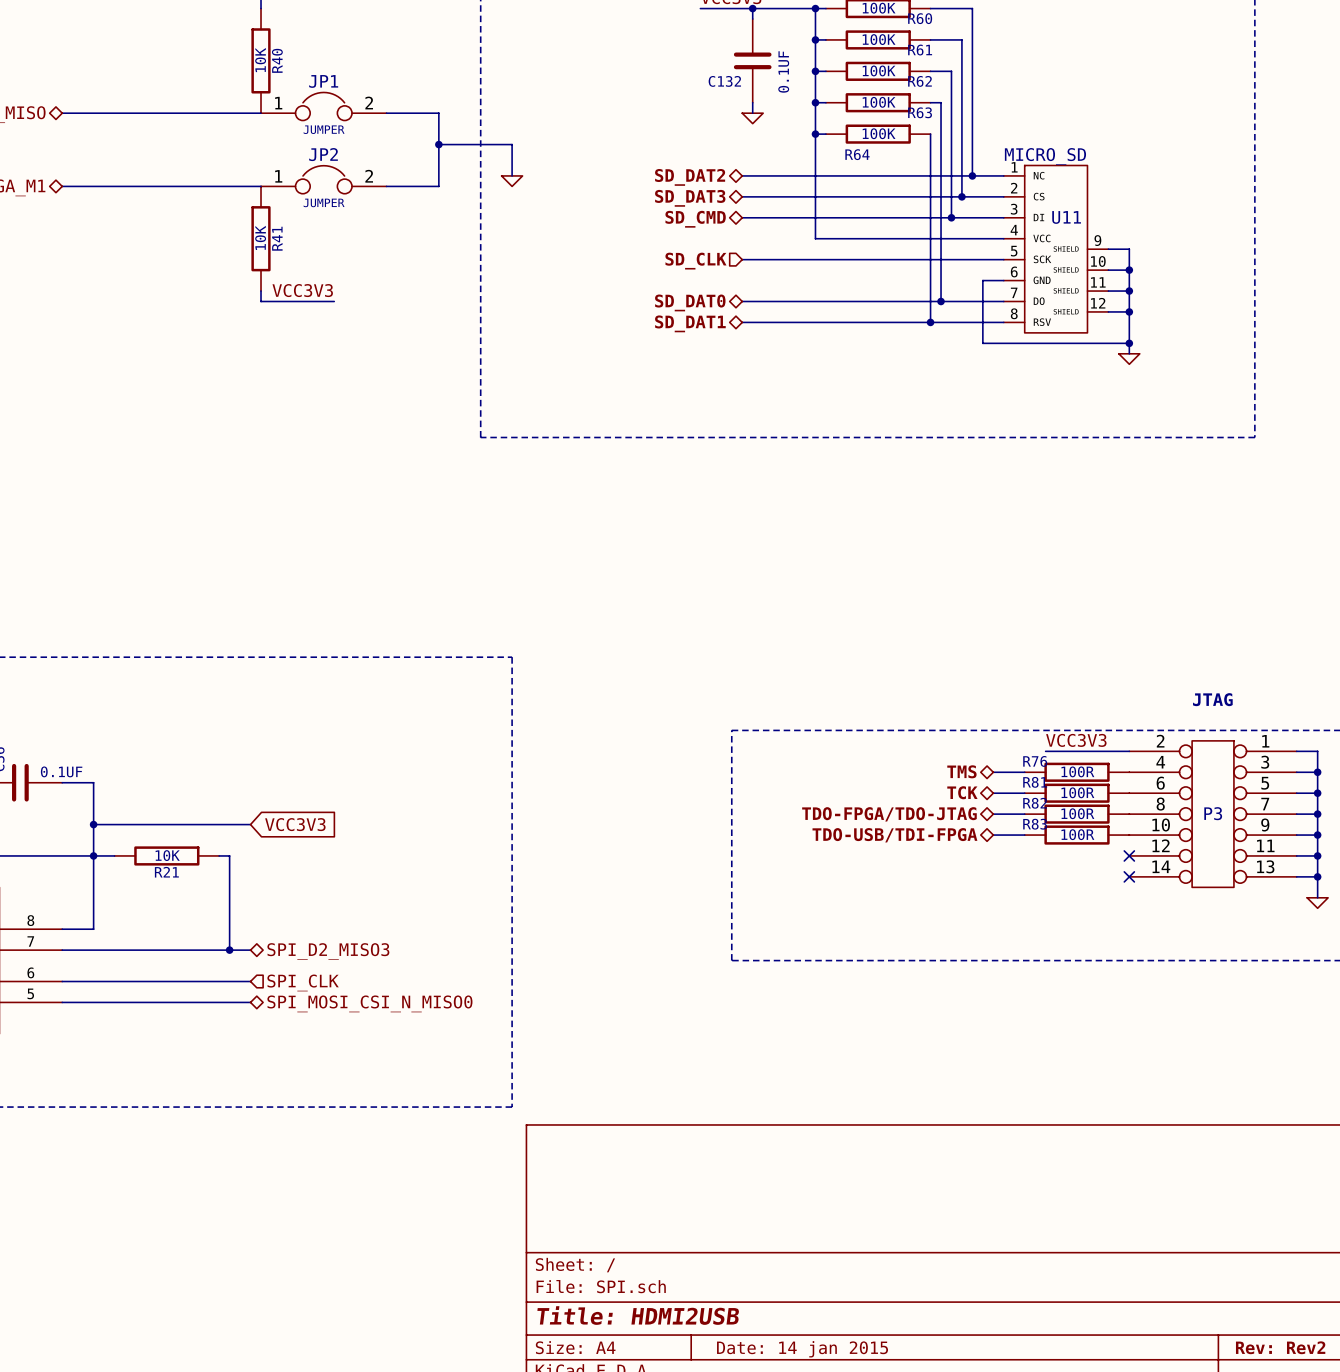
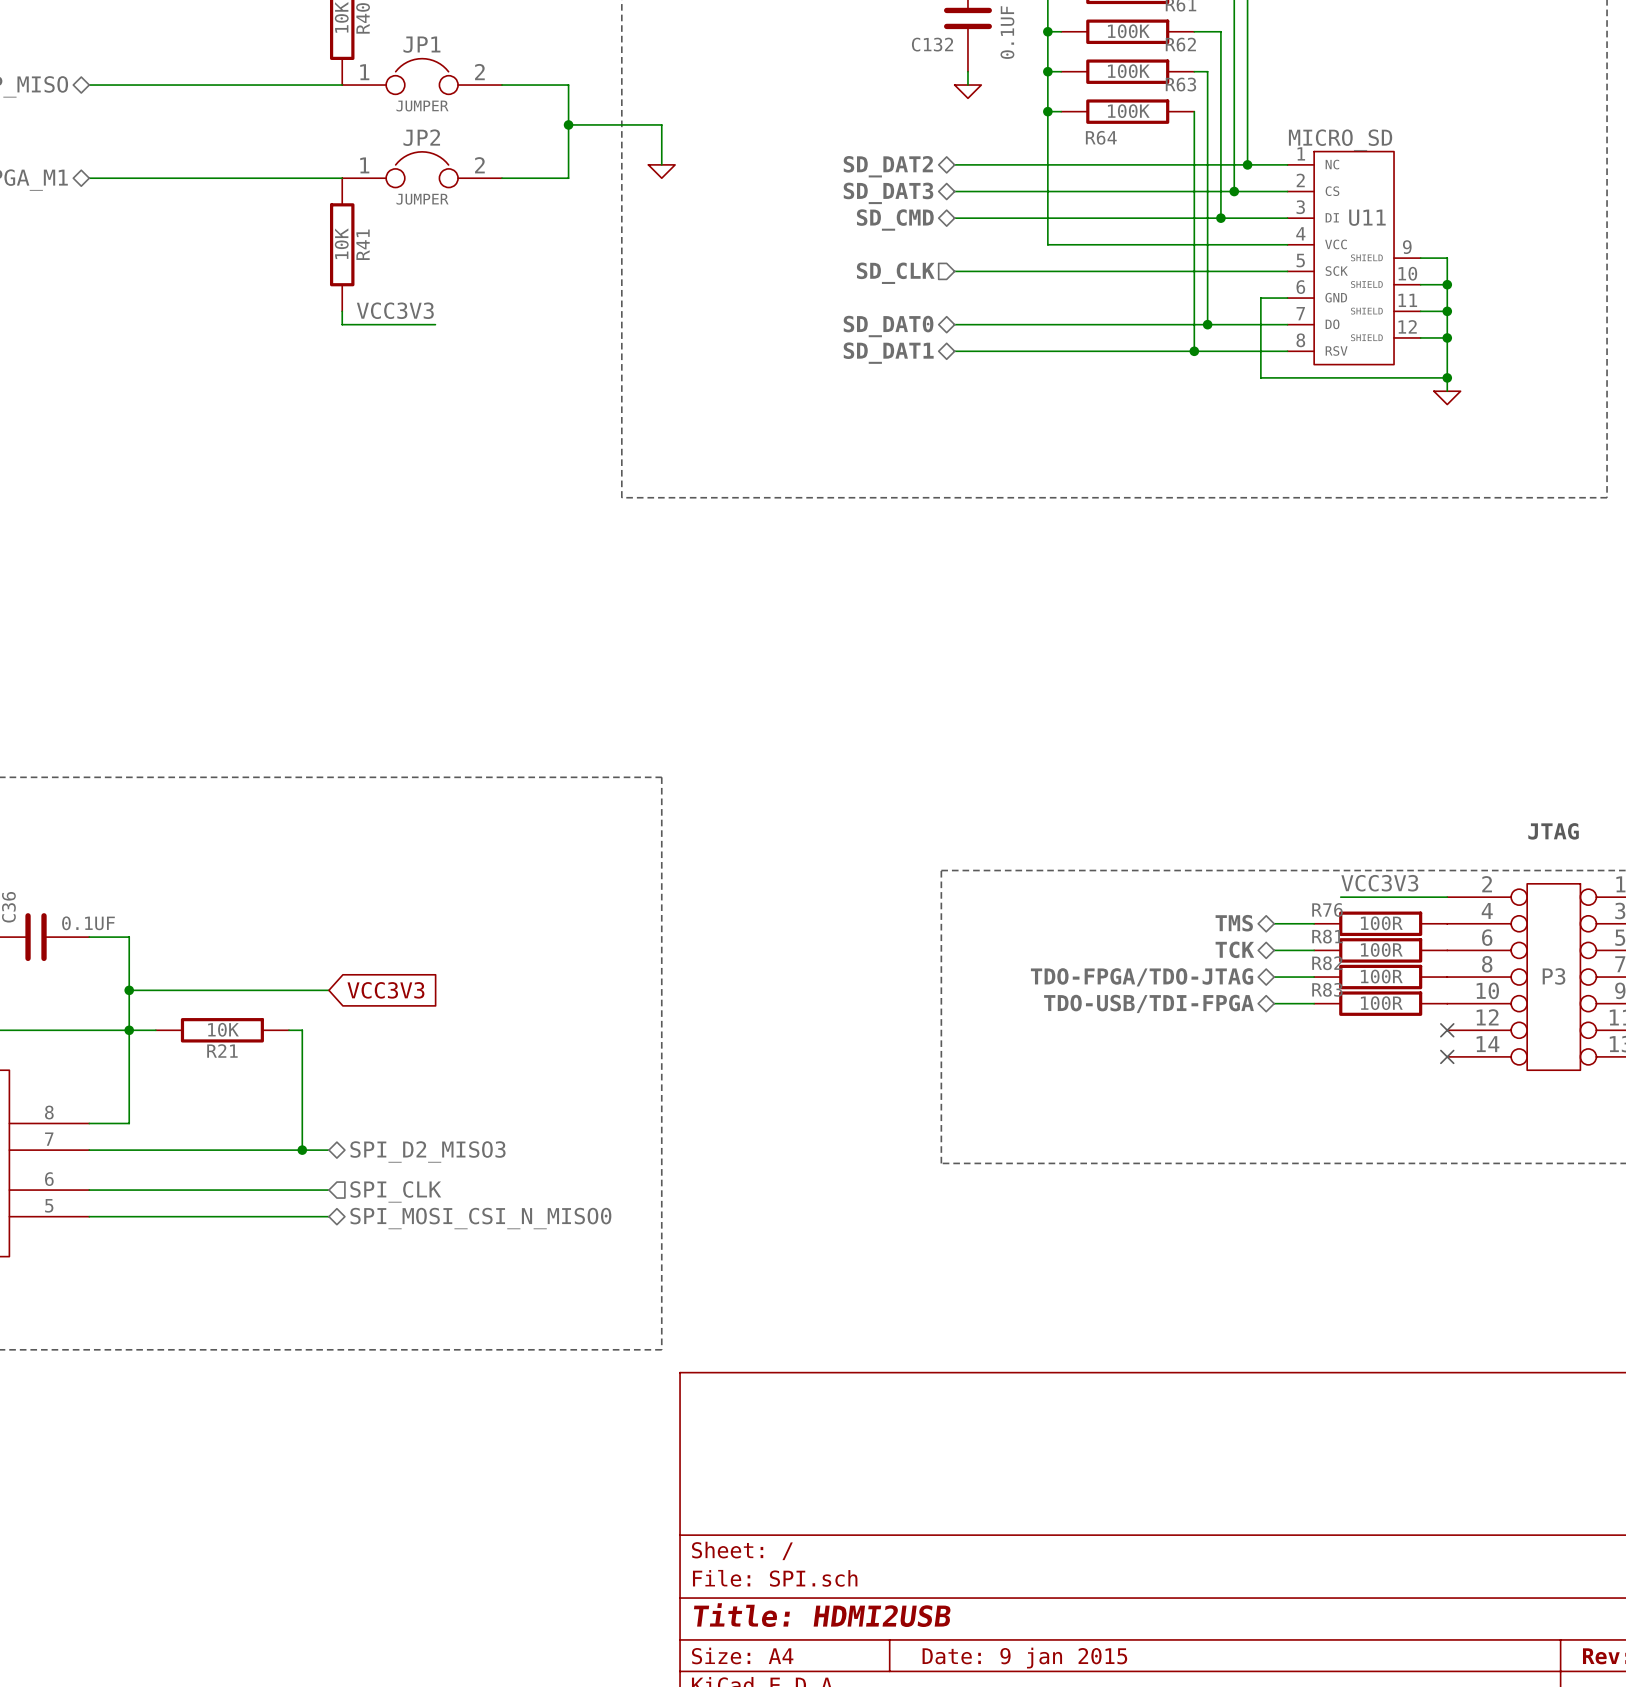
title block: Date: 14 jan 2015 (802, 1349) -> Date: 9 jan 2015 (1024, 1658)

